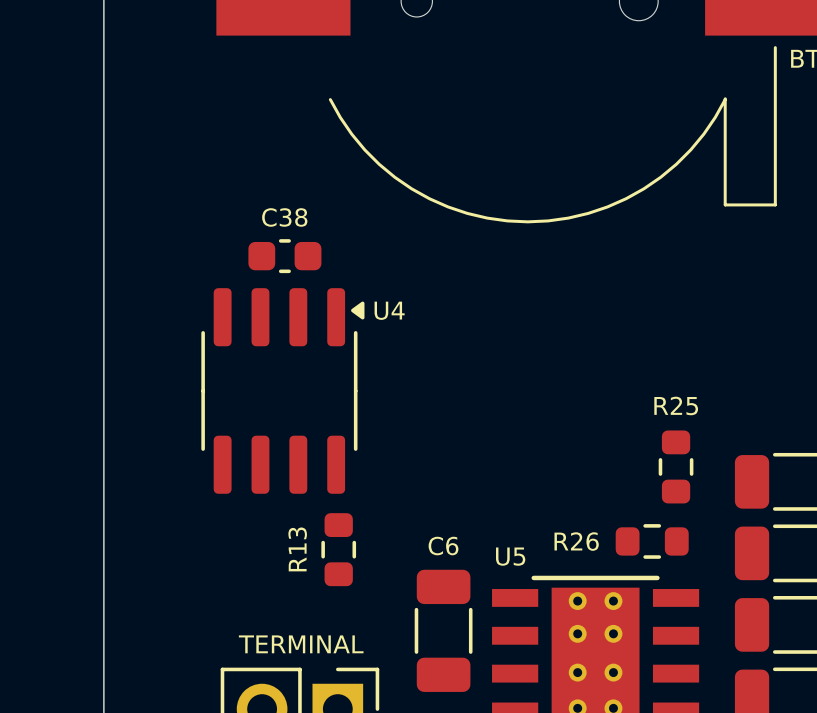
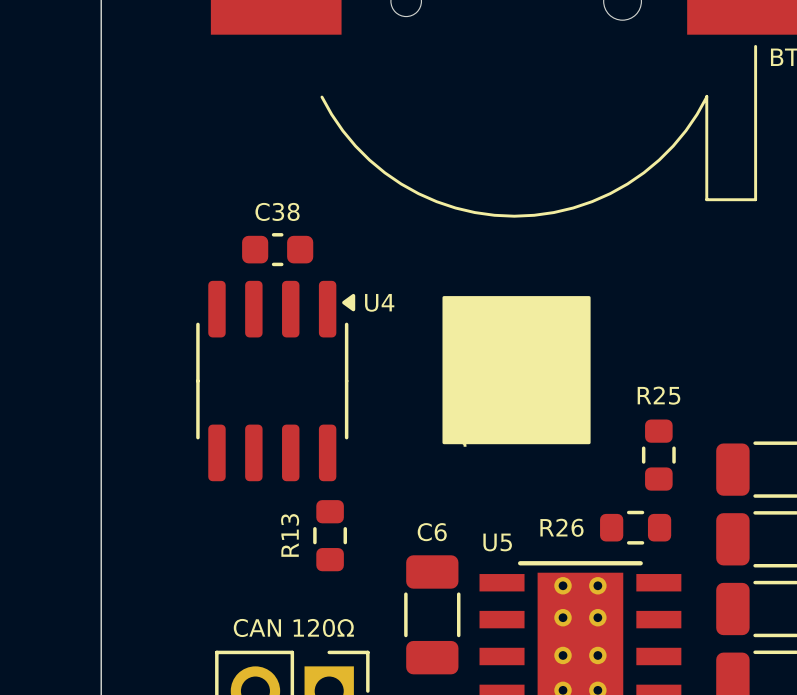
drawing: none -> [442, 296, 591, 445]
part value: TERMINAL (301, 644) -> CAN 120Ω (293, 627)

